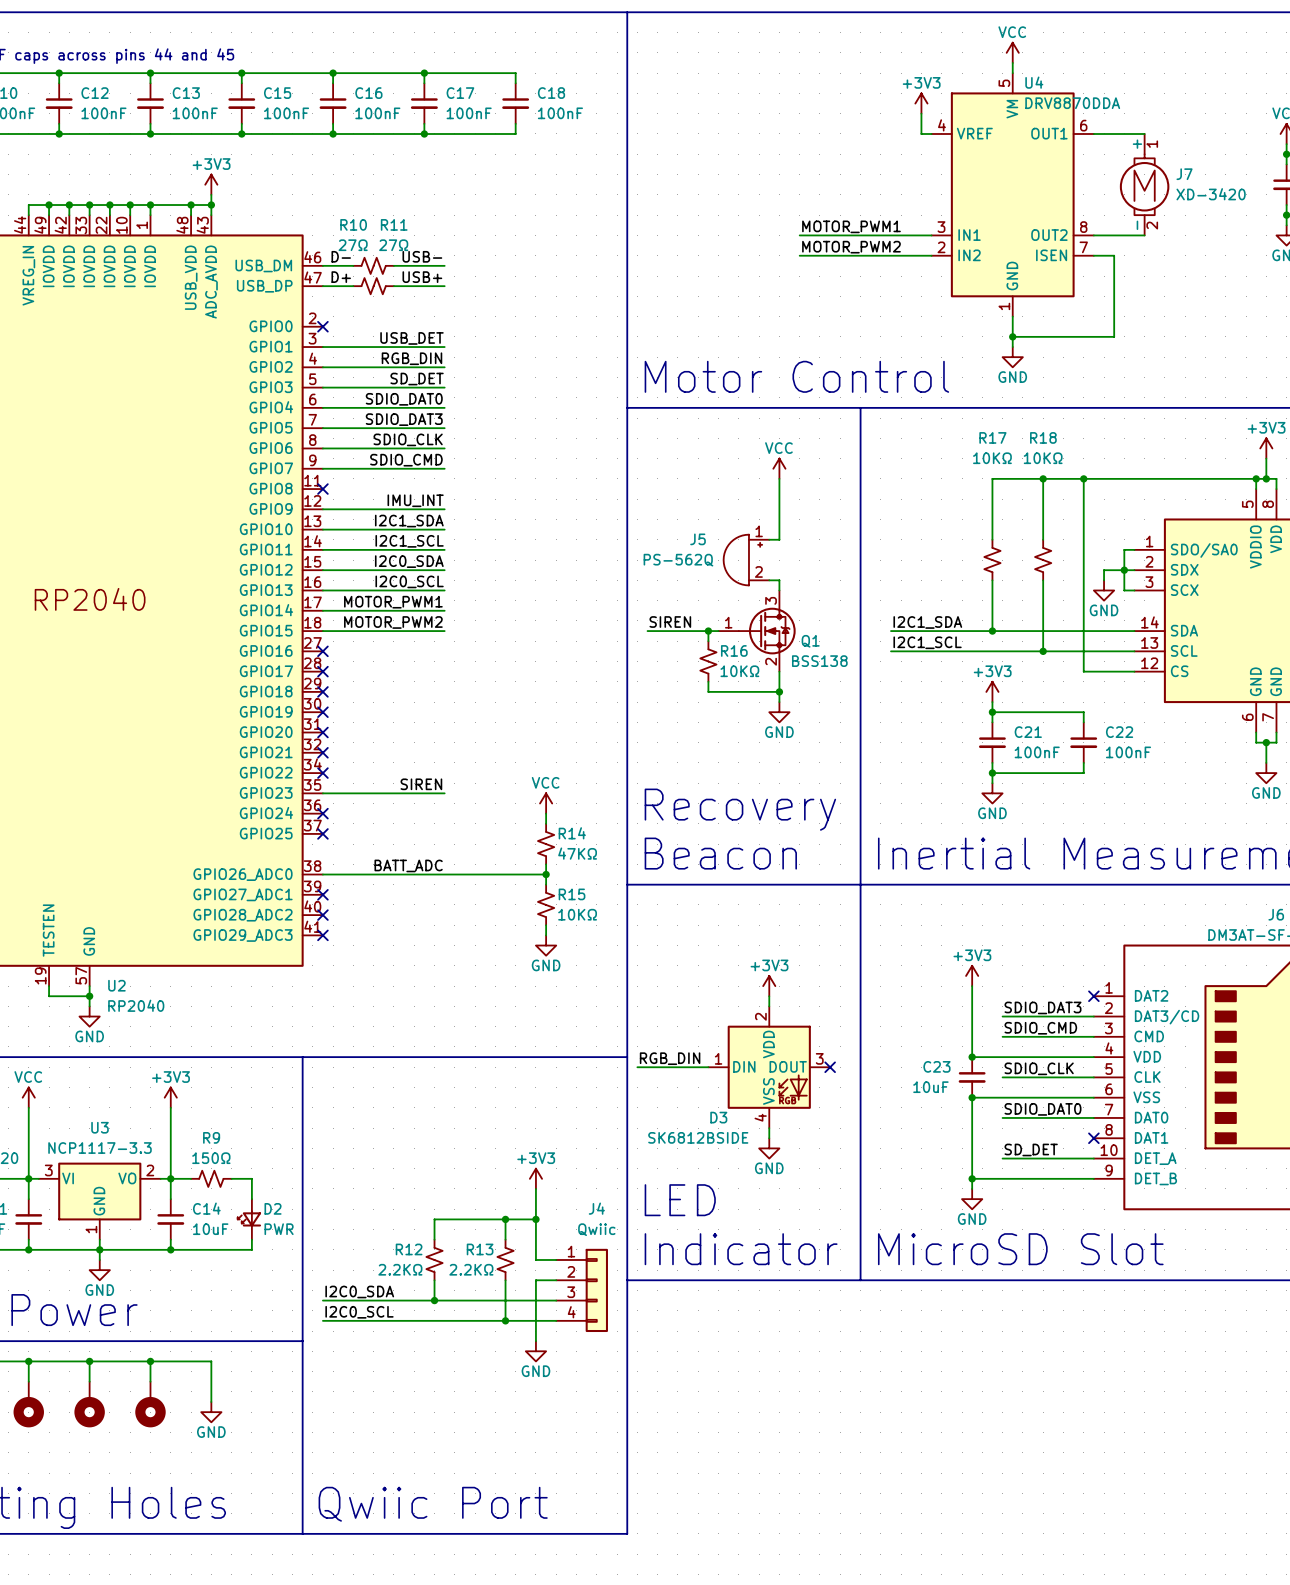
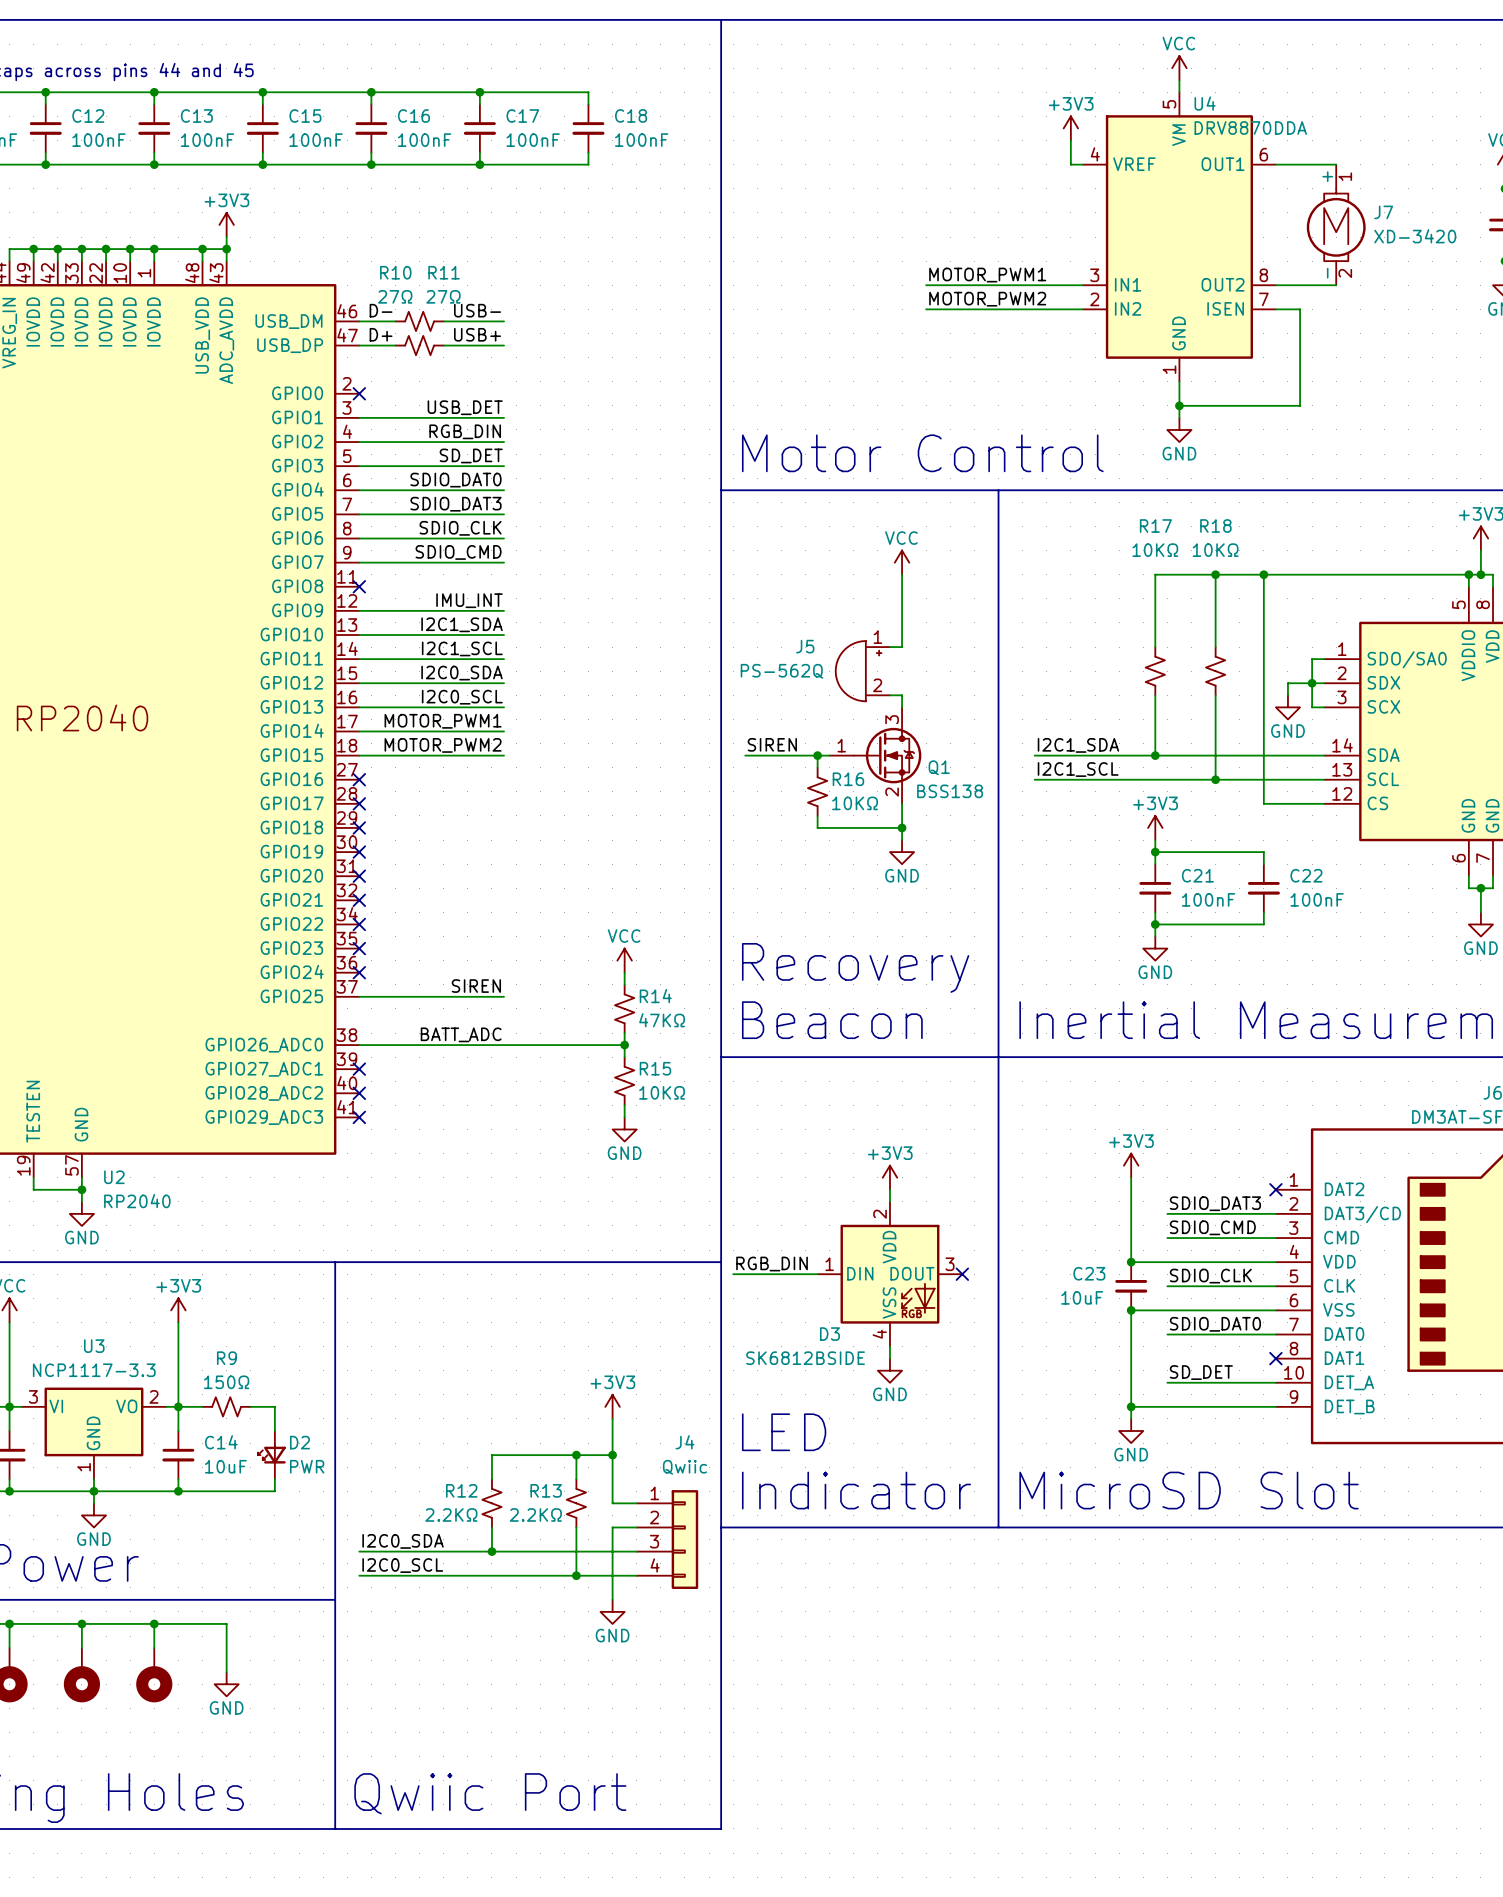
label position: SIREN (421, 784) -> SIREN (476, 986)
wire: (322, 793) (444, 793) -> (359, 996) (504, 996)
no-connect mark position: (322, 833) -> (359, 948)

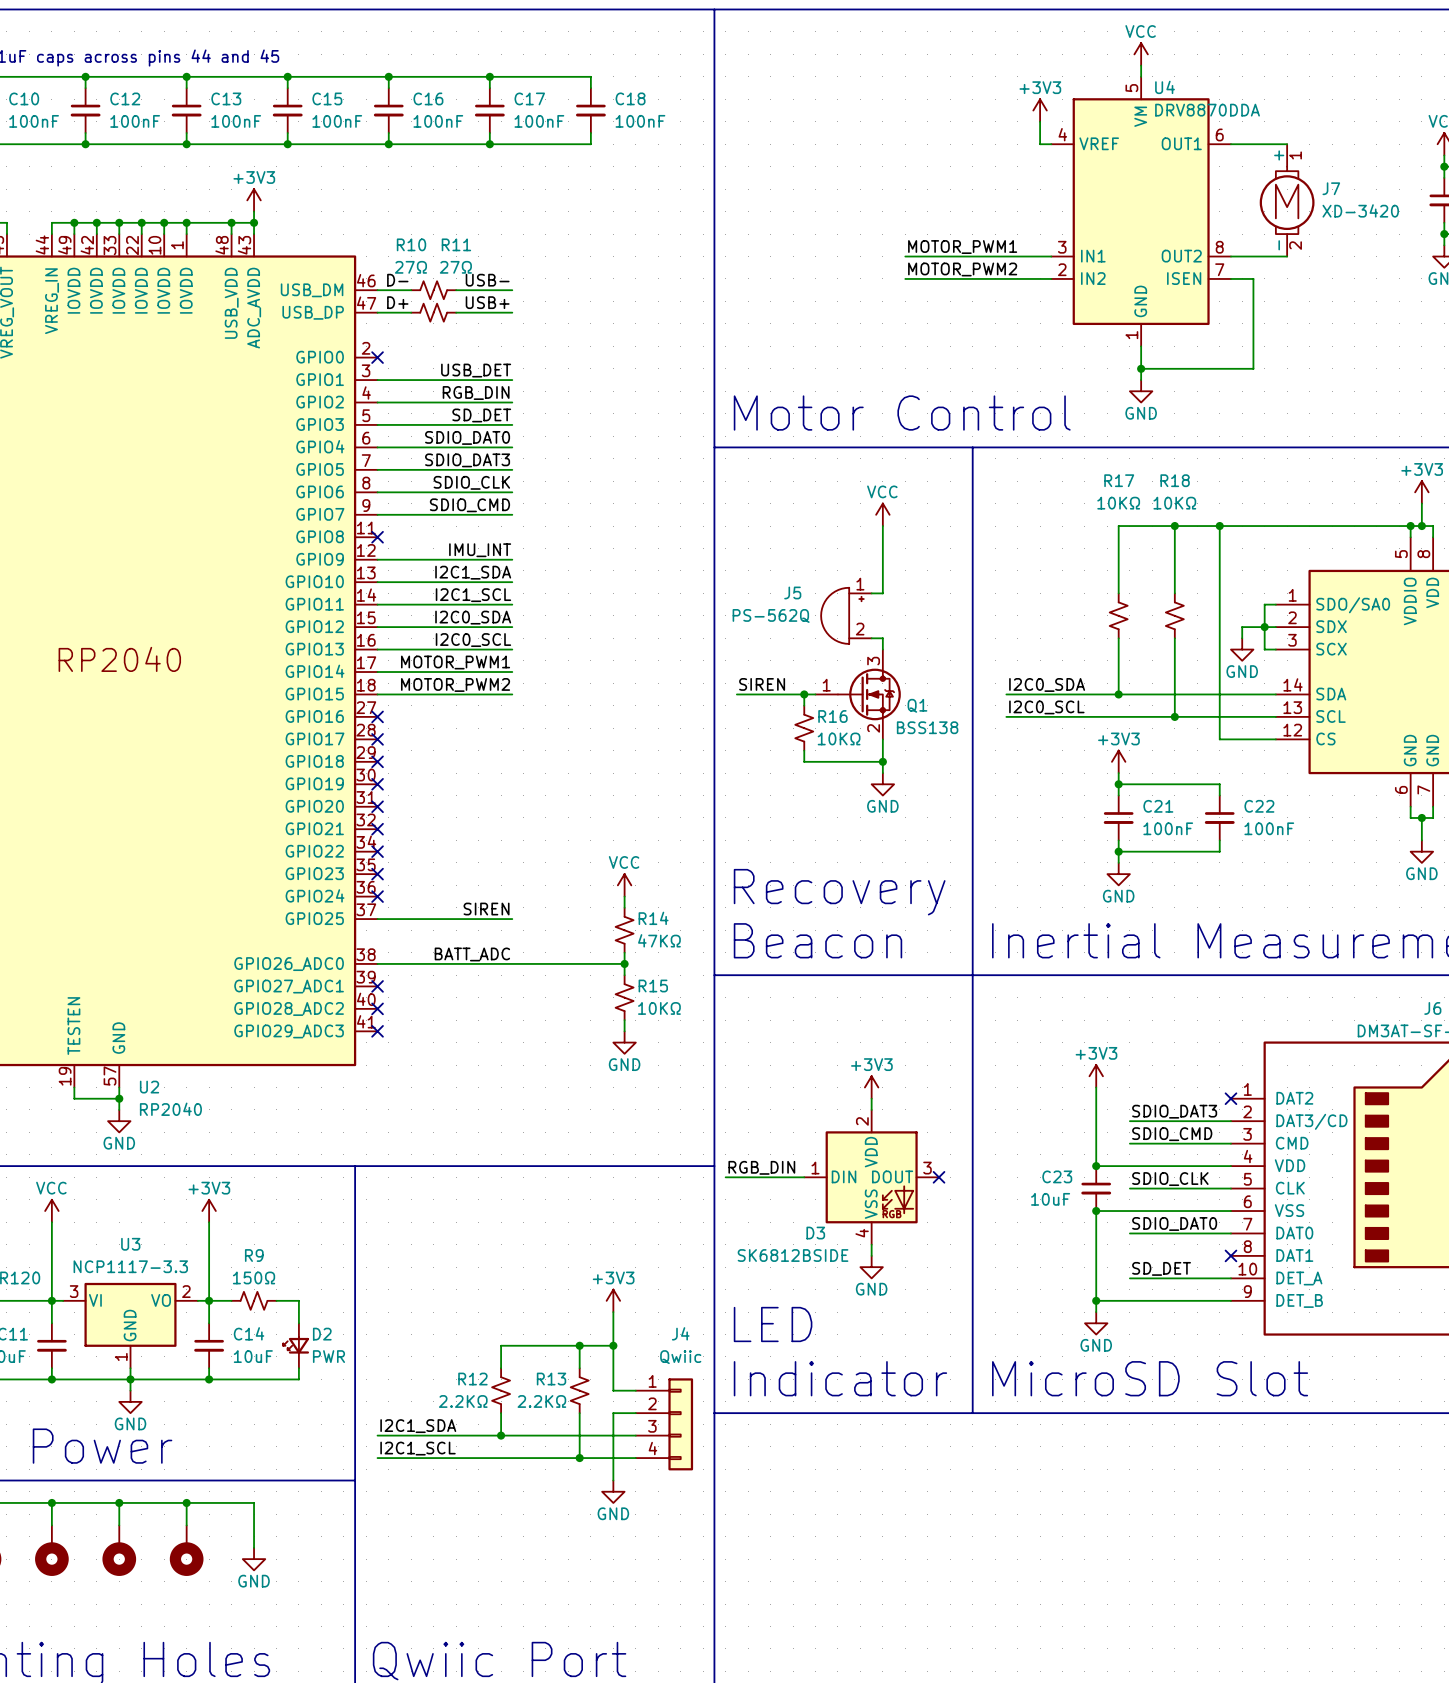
label: I2C1_SDA (1078, 745) -> I2C0_SDA (1047, 684)
label: I2C1_SCL (1078, 769) -> I2C0_SCL (1046, 707)
label: I2C0_SDA (403, 1541) -> I2C1_SDA (418, 1426)
label: I2C0_SCL (402, 1565) -> I2C1_SCL (418, 1448)

